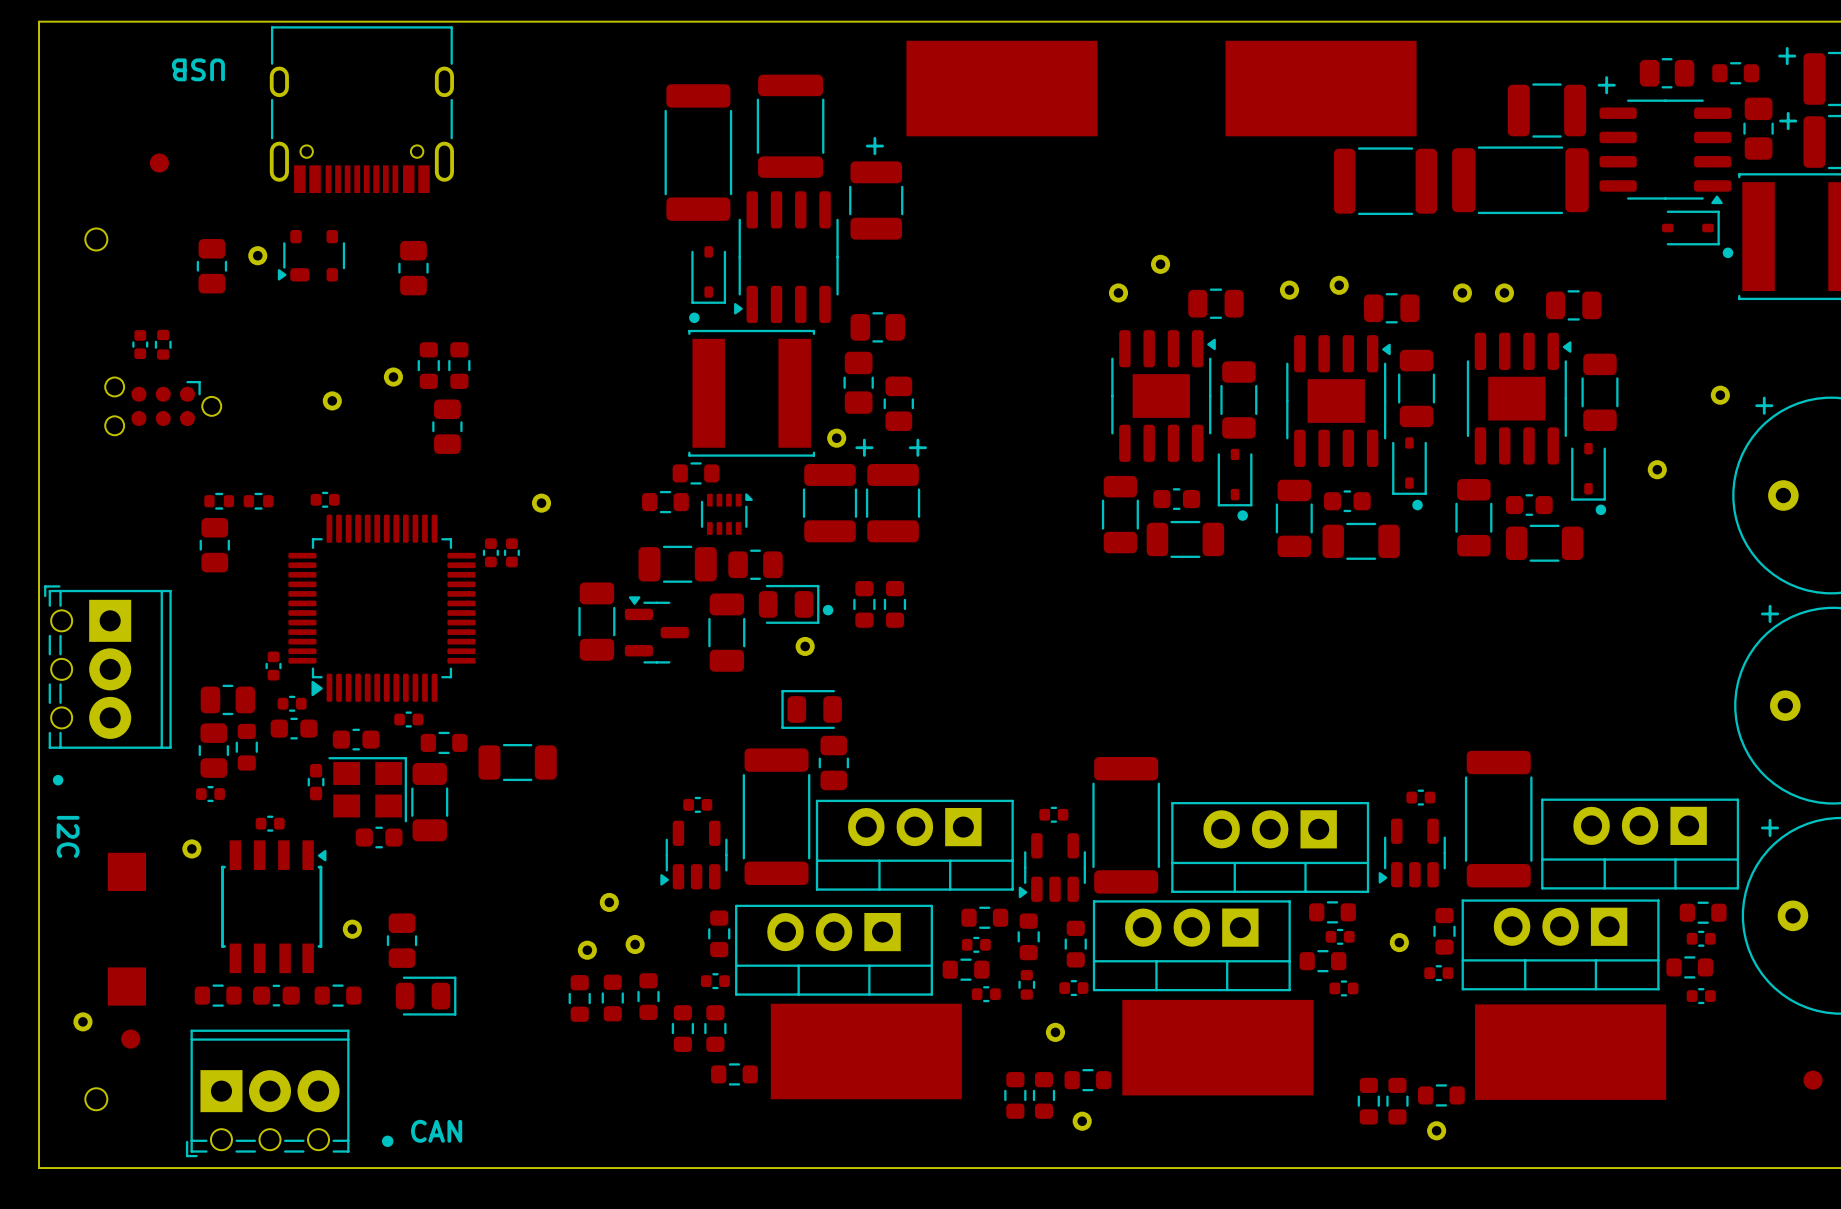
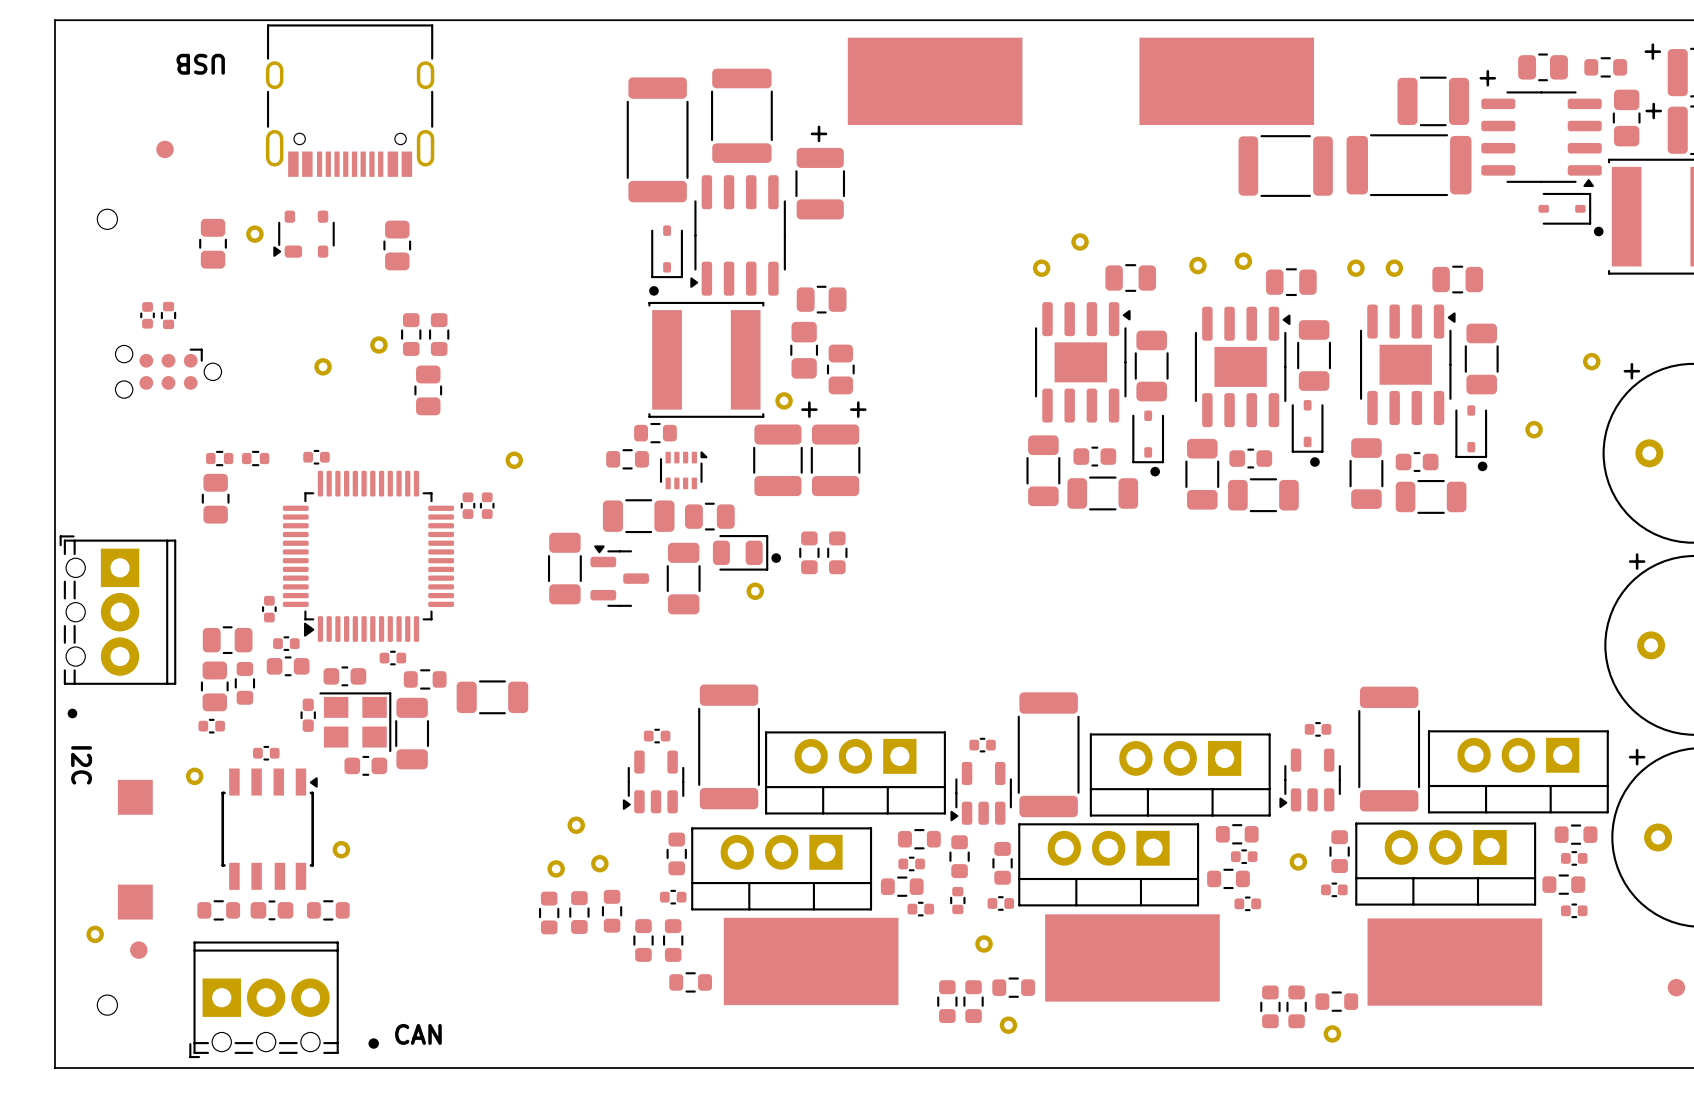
part: (811, 709) -> none
part: (833, 762) -> none
part: (402, 940) -> none
part: (426, 996) -> none

